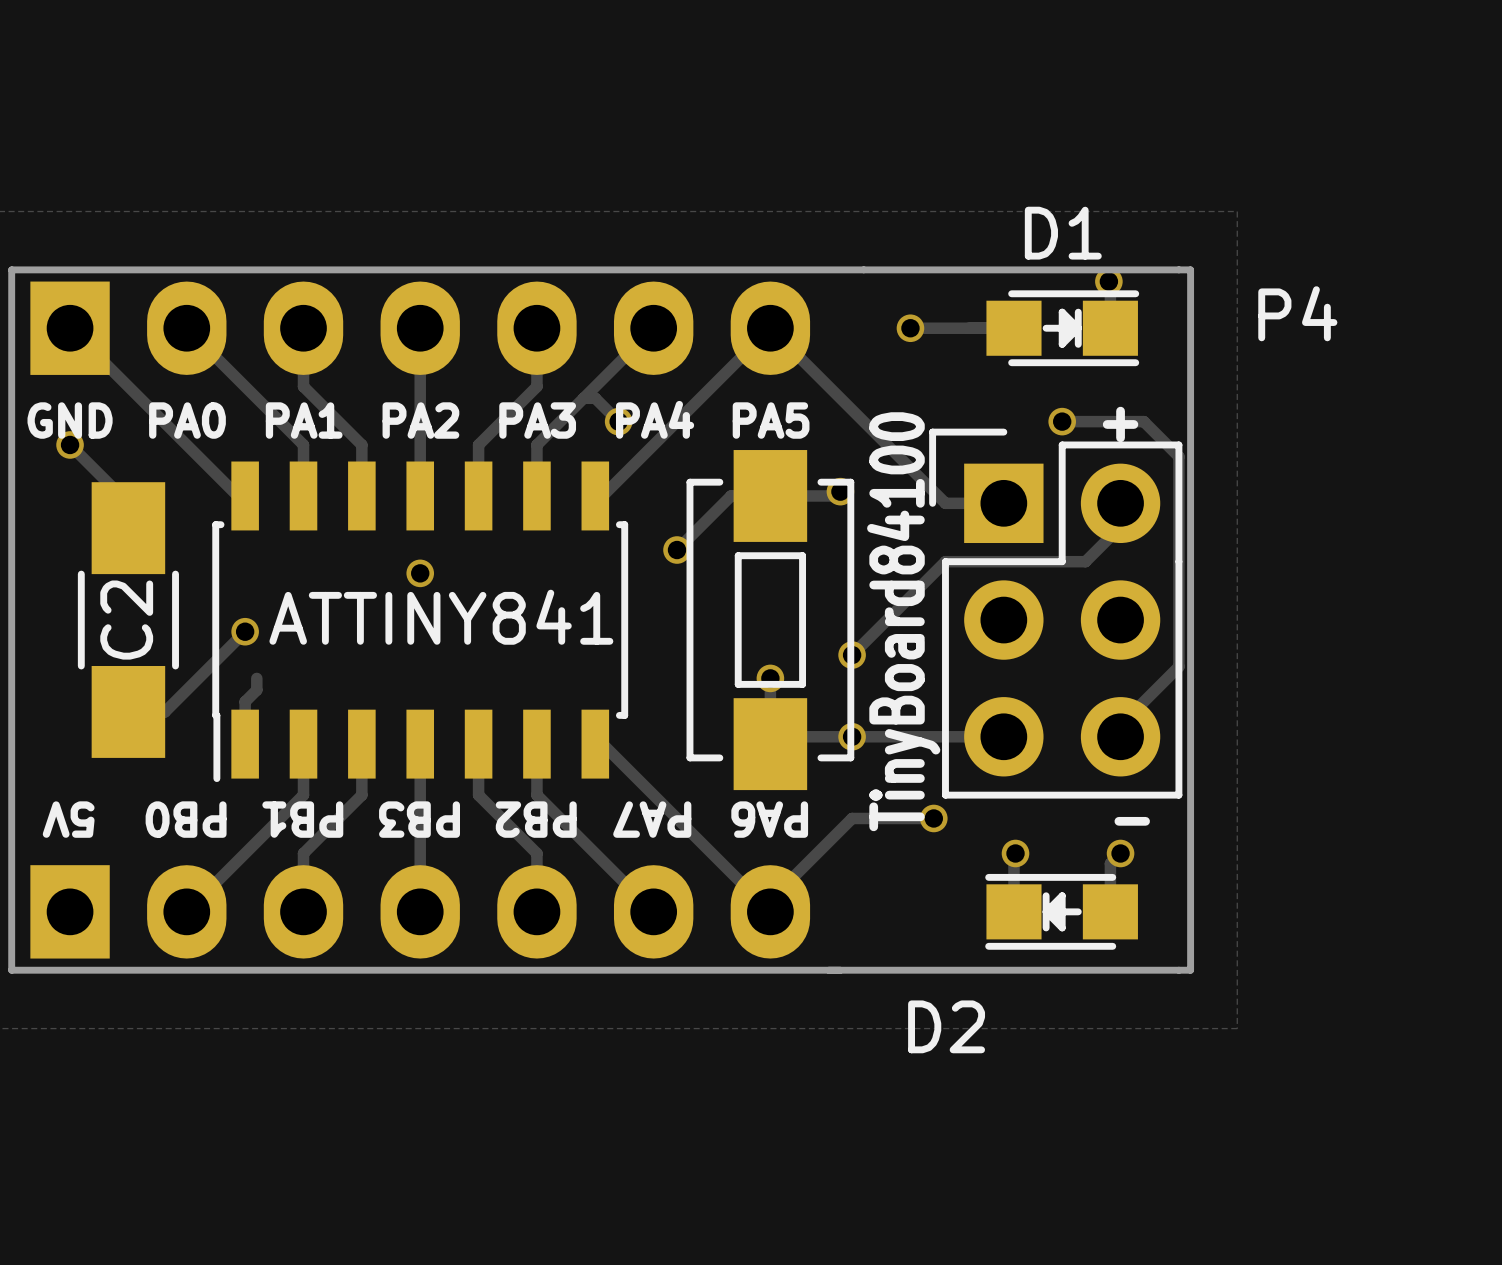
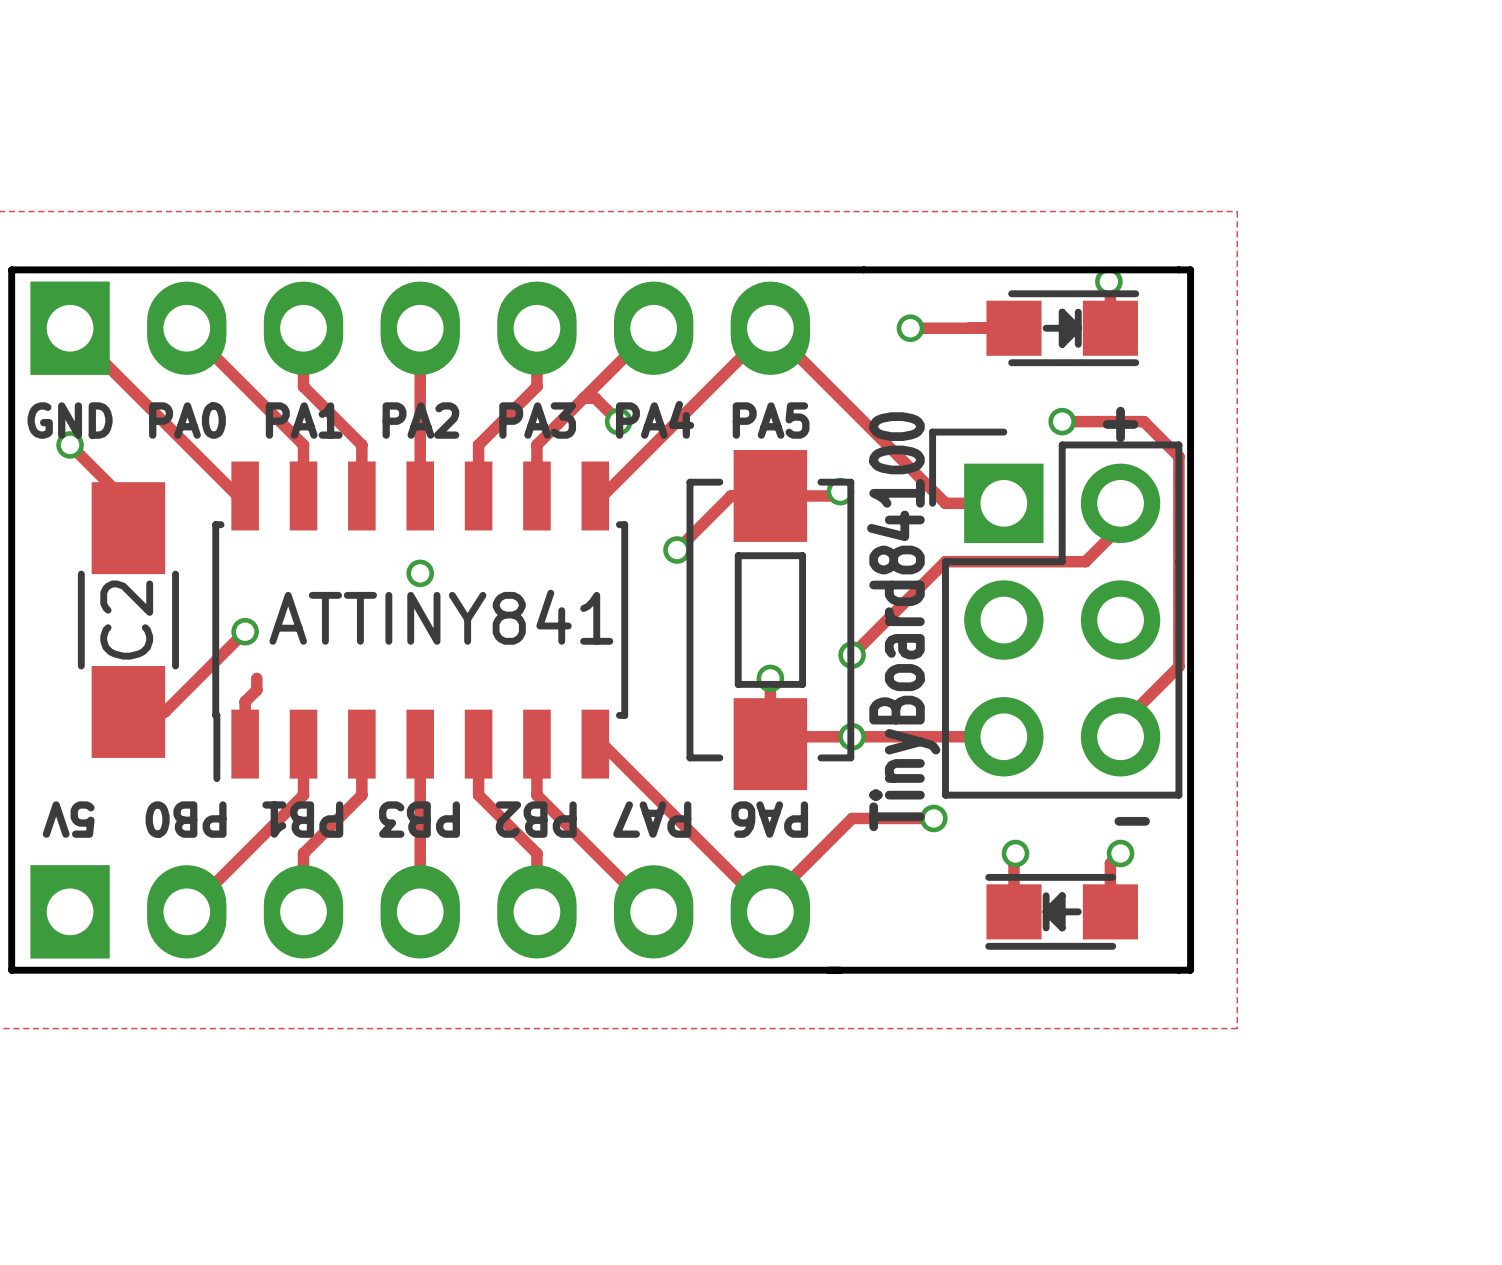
D1 name: D1 (1063, 233) -> none
P4 name: P4 (1297, 313) -> none
D2 name: D2 (946, 1026) -> none

